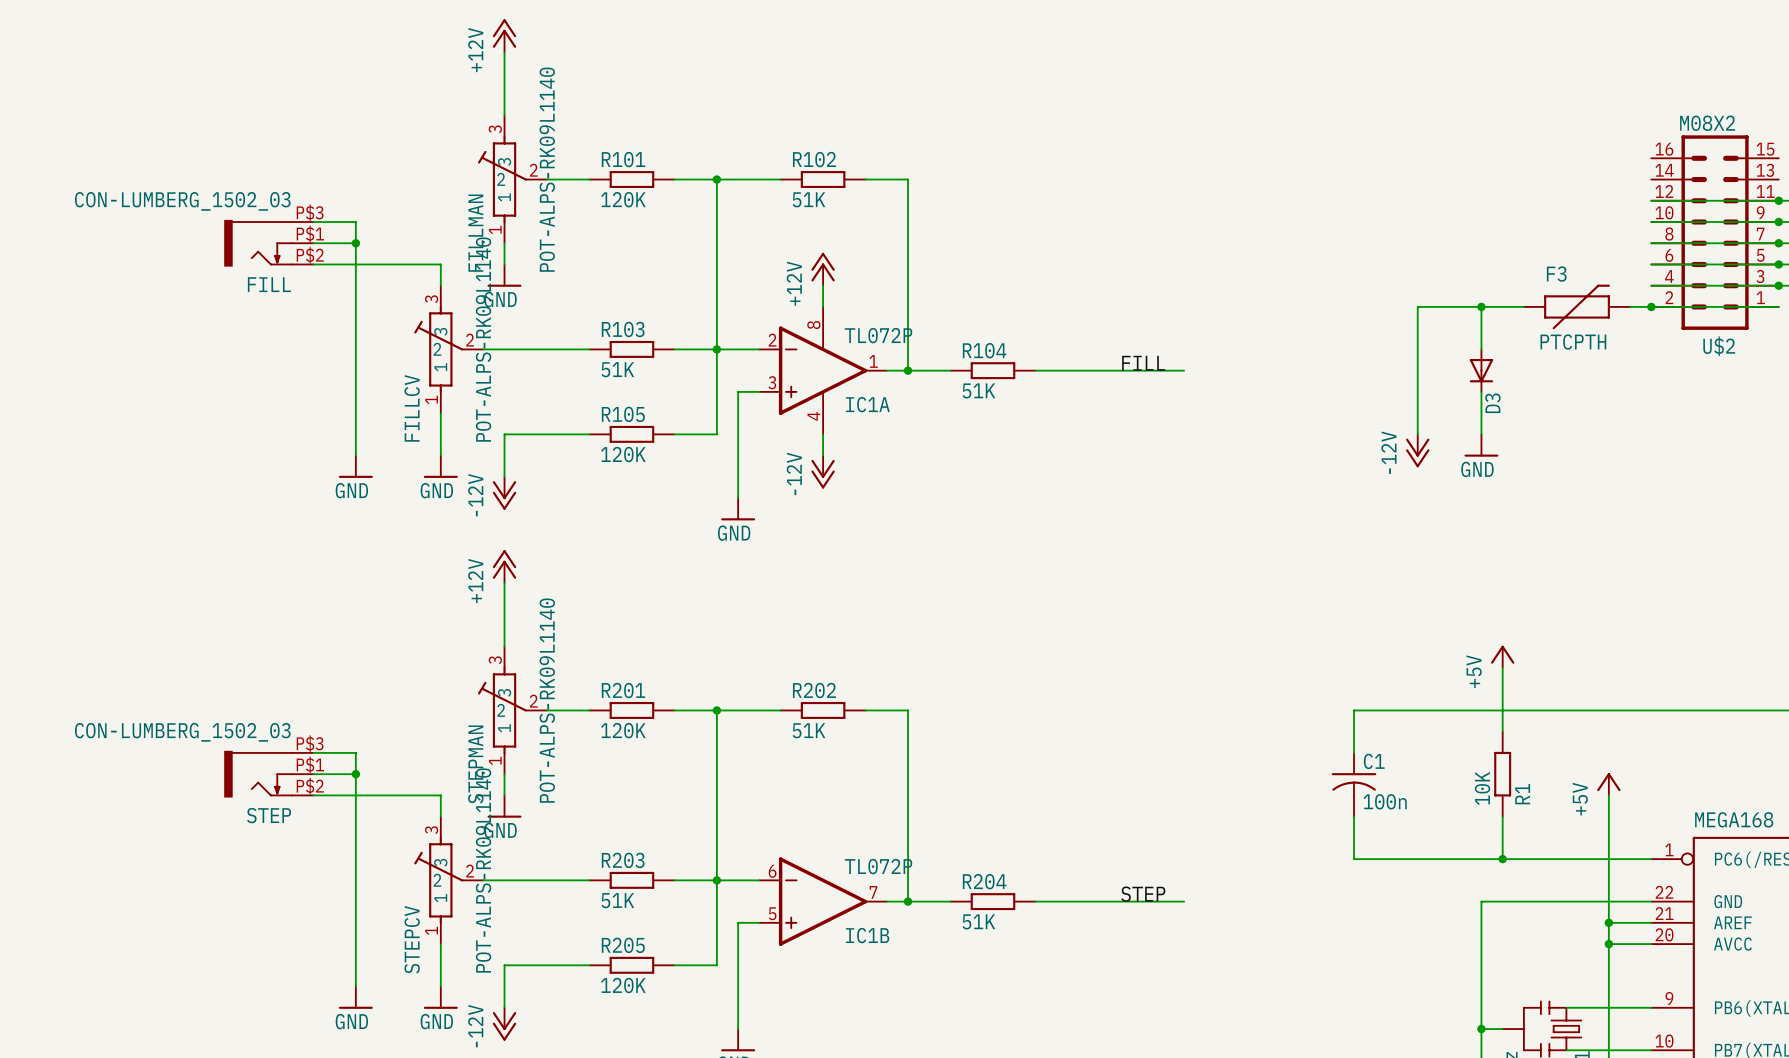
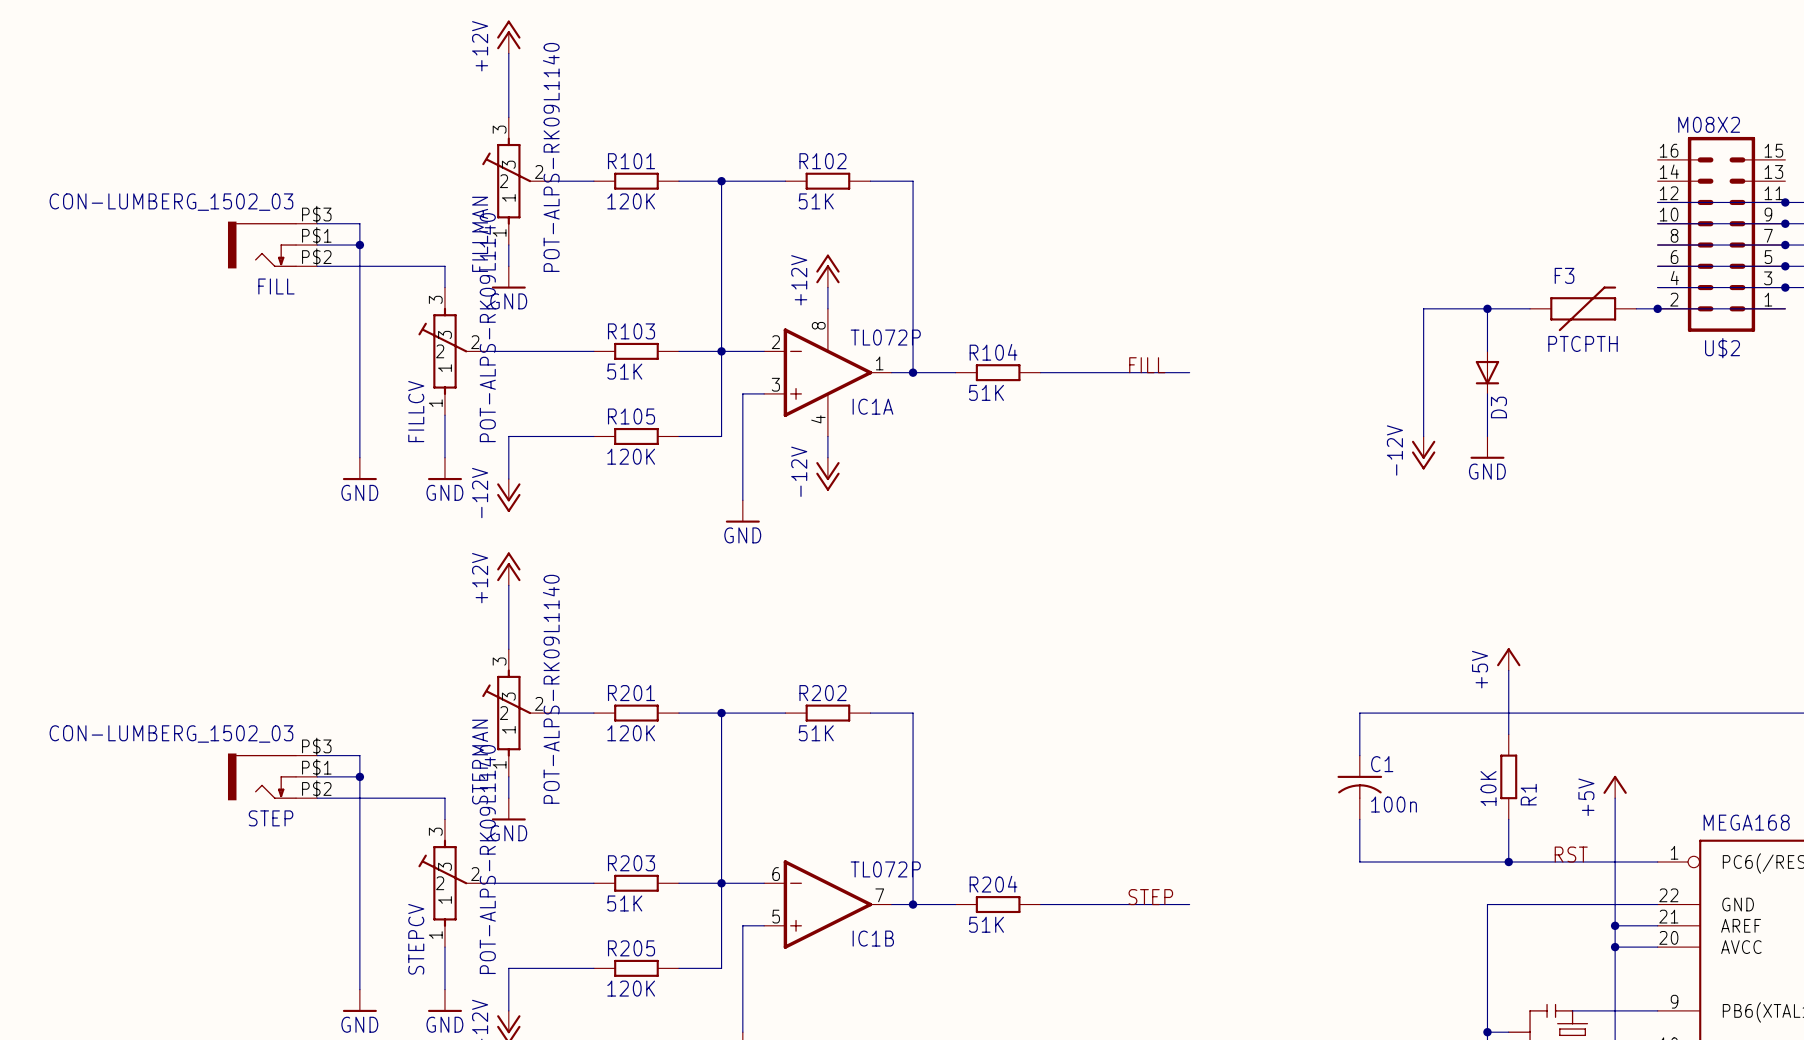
label: none -> RST (1571, 854)

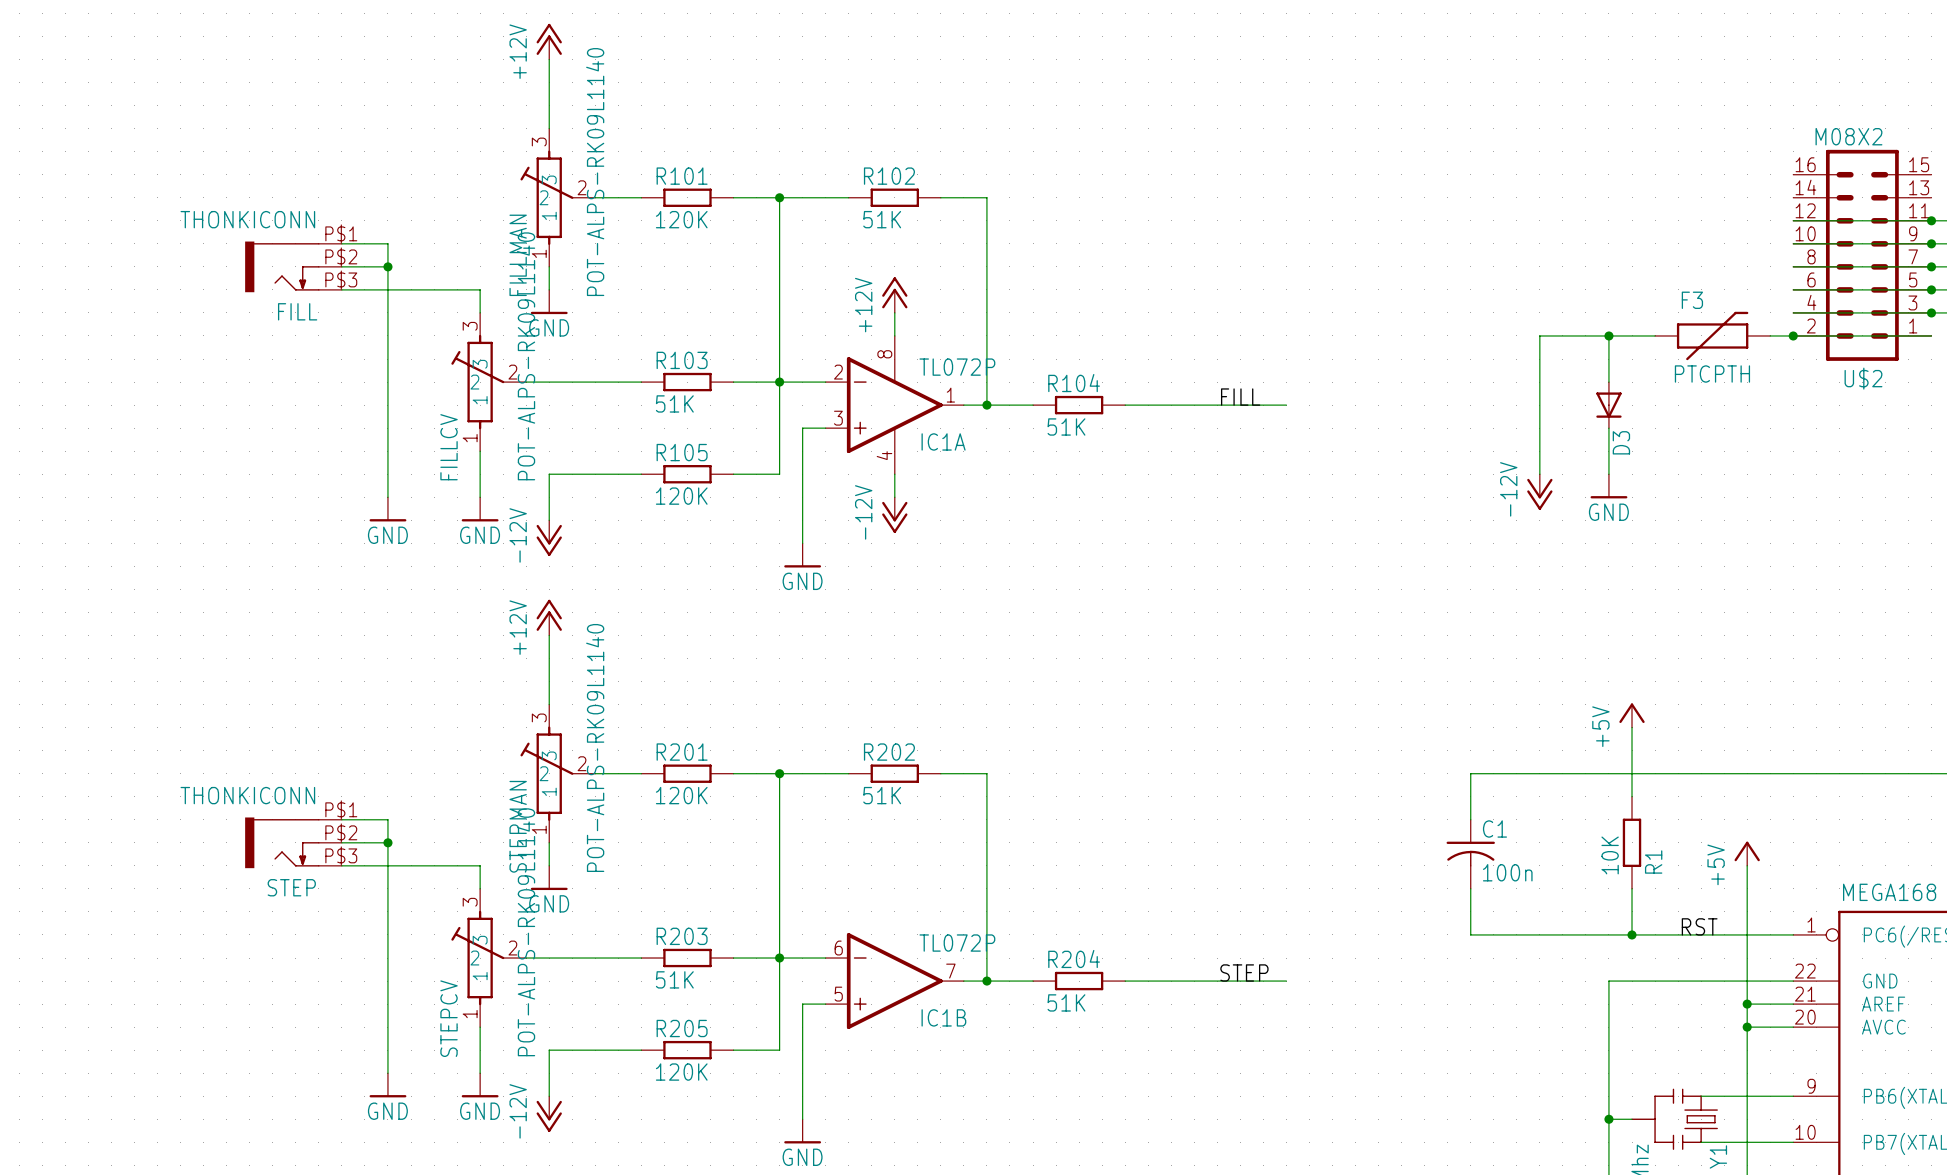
FILL value: CON-LUMBERG_1502_03 (171, 202) -> THONKICONN (247, 219)
FILL pin number: P$3 (316, 214) -> P$1 (341, 233)
FILL pin number: P$1 (316, 235) -> P$2 (341, 256)
FILL pin number: P$2 (316, 257) -> P$3 (341, 279)
STEP value: CON-LUMBERG_1502_03 (171, 733) -> THONKICONN (247, 795)
STEP pin number: P$3 (316, 746) -> P$1 (341, 809)
STEP pin number: P$1 (316, 767) -> P$2 (341, 832)
STEP pin number: P$2 (316, 788) -> P$3 (341, 855)

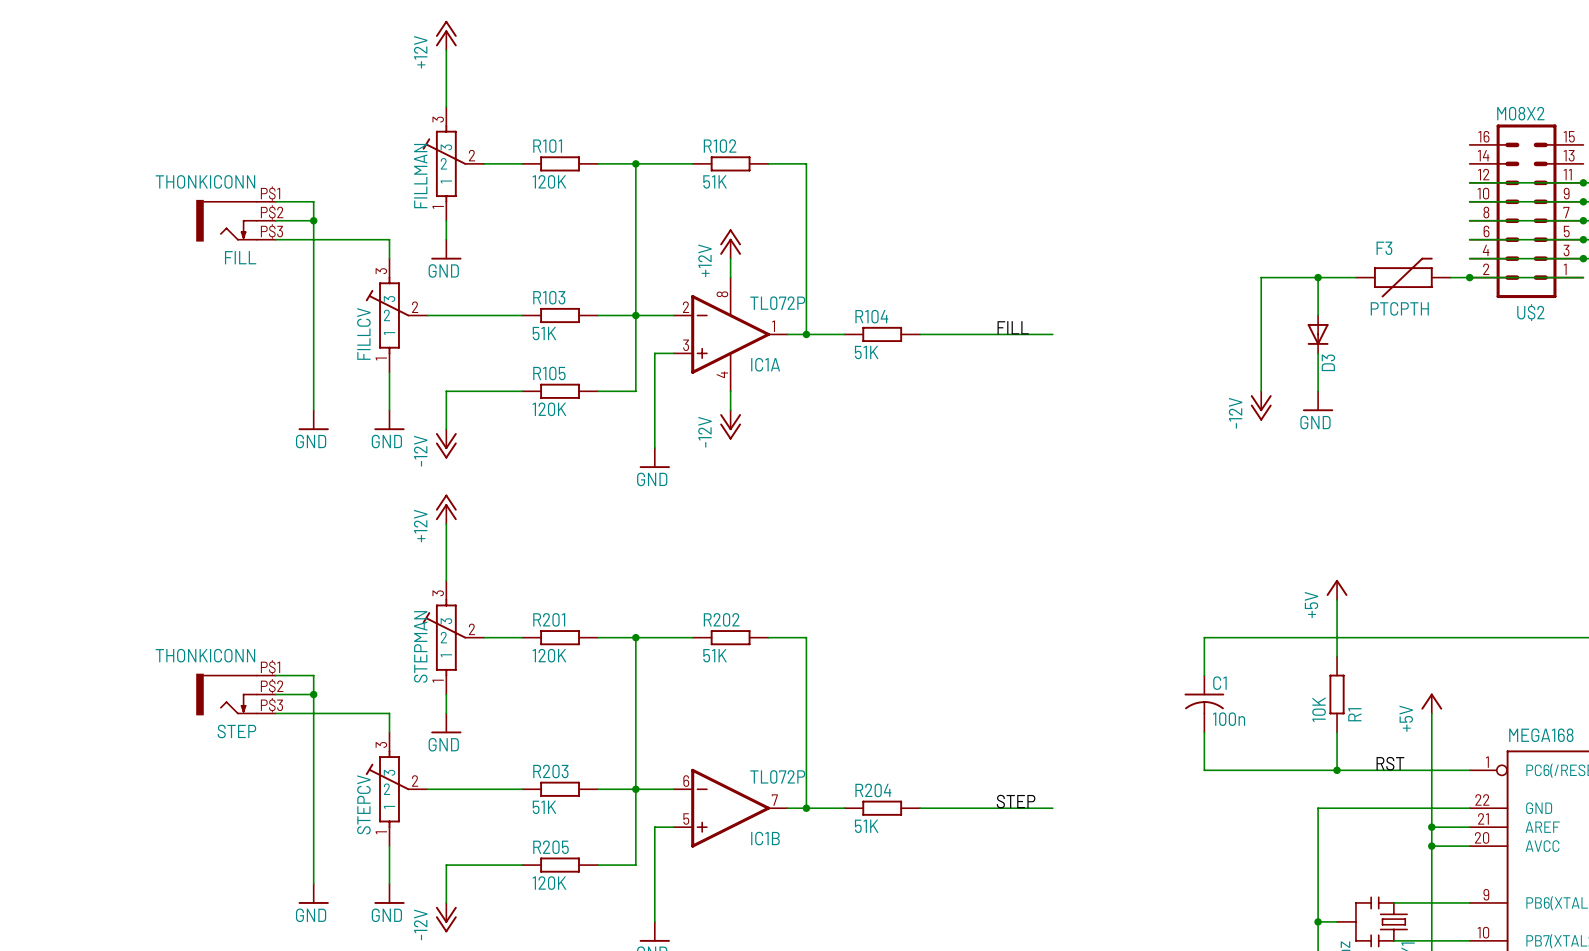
FILLMAN value: POT-ALPS-RK09L1140 (595, 172) -> none
FILLMAN name position: FILLMAN (518, 255) -> FILLMAN (420, 176)
FILLCV value: POT-ALPS-RK09L1140 (526, 356) -> none
FILLCV name position: FILLCV (449, 447) -> FILLCV (363, 334)
STEPMAN value: POT-ALPS-RK09L1140 (595, 747) -> none
STEPMAN name position: STEPMAN (518, 826) -> STEPMAN (420, 646)
STEPCV value: POT-ALPS-RK09L1140 (526, 932) -> none
STEPCV name position: STEPCV (449, 1018) -> STEPCV (363, 804)

